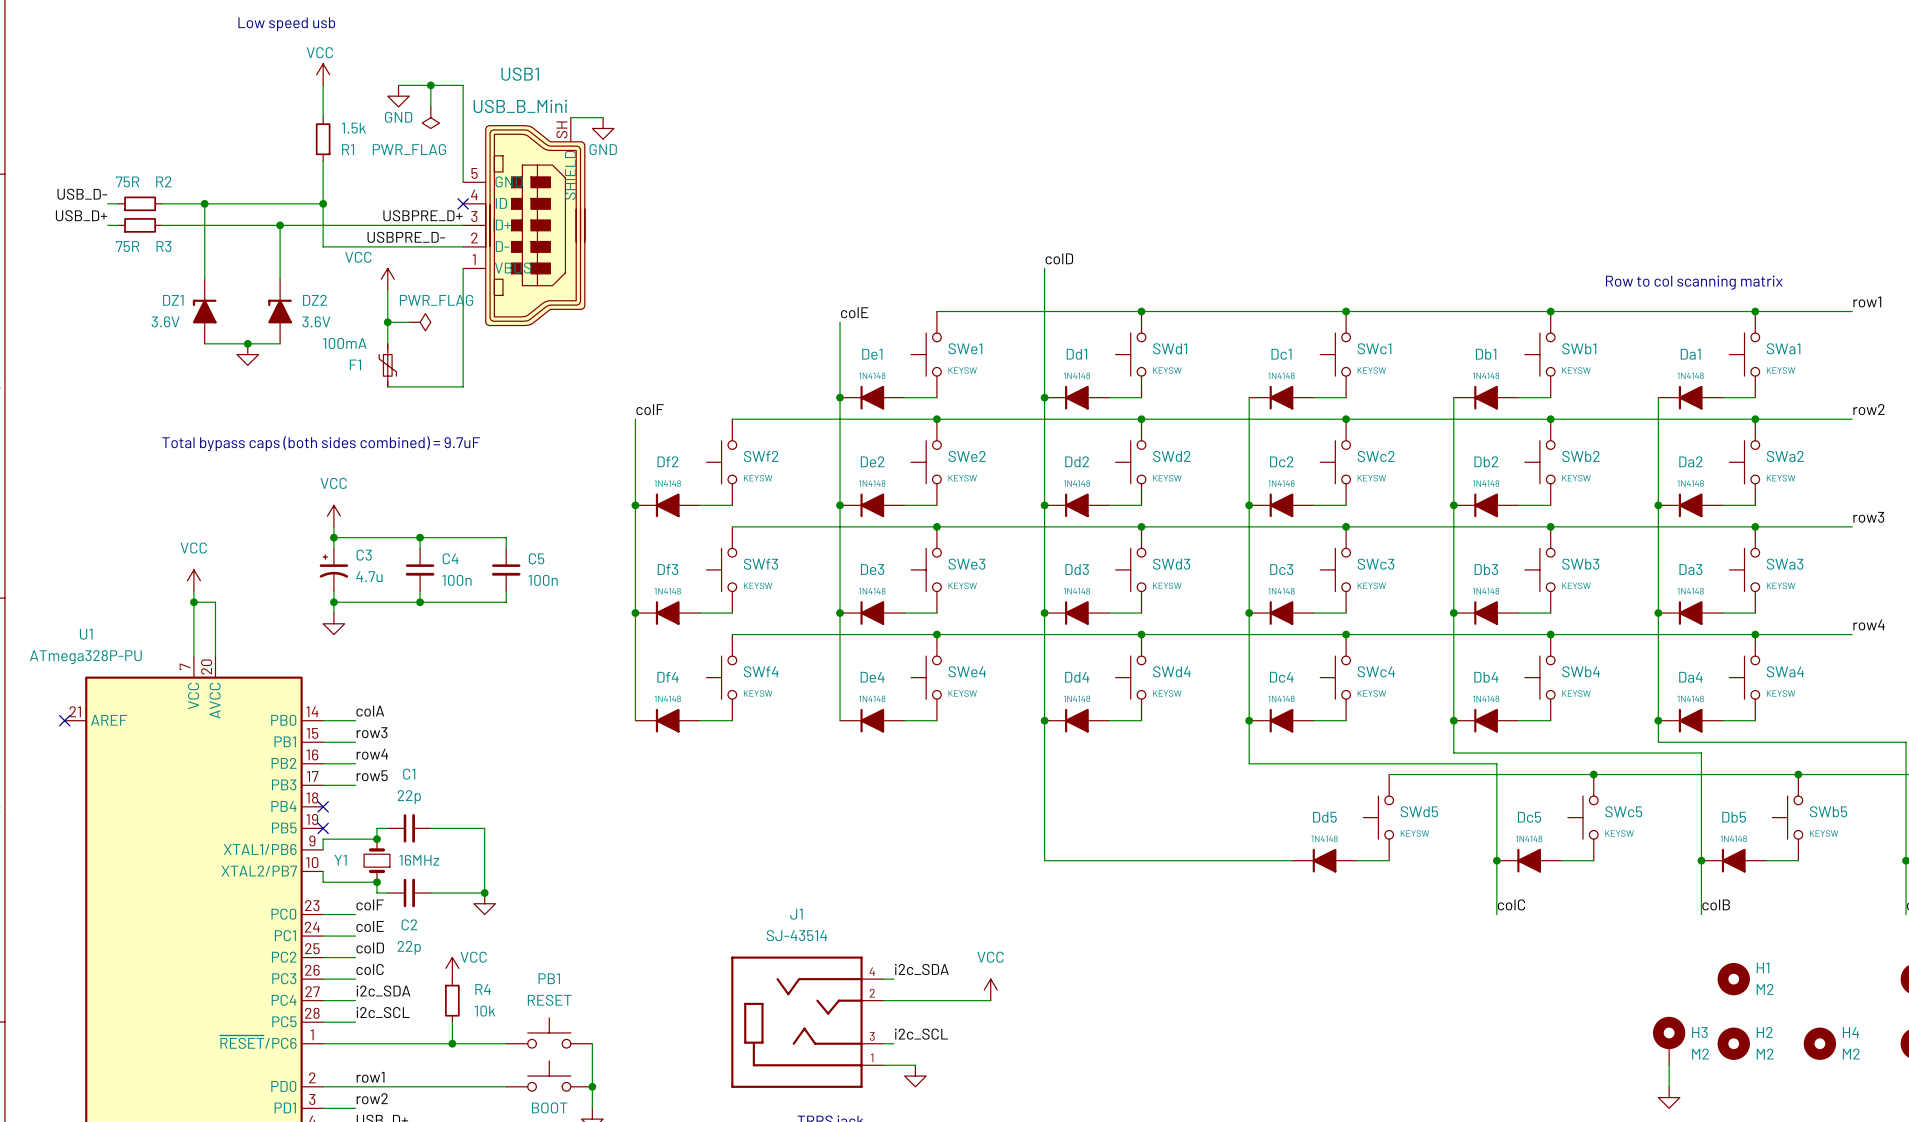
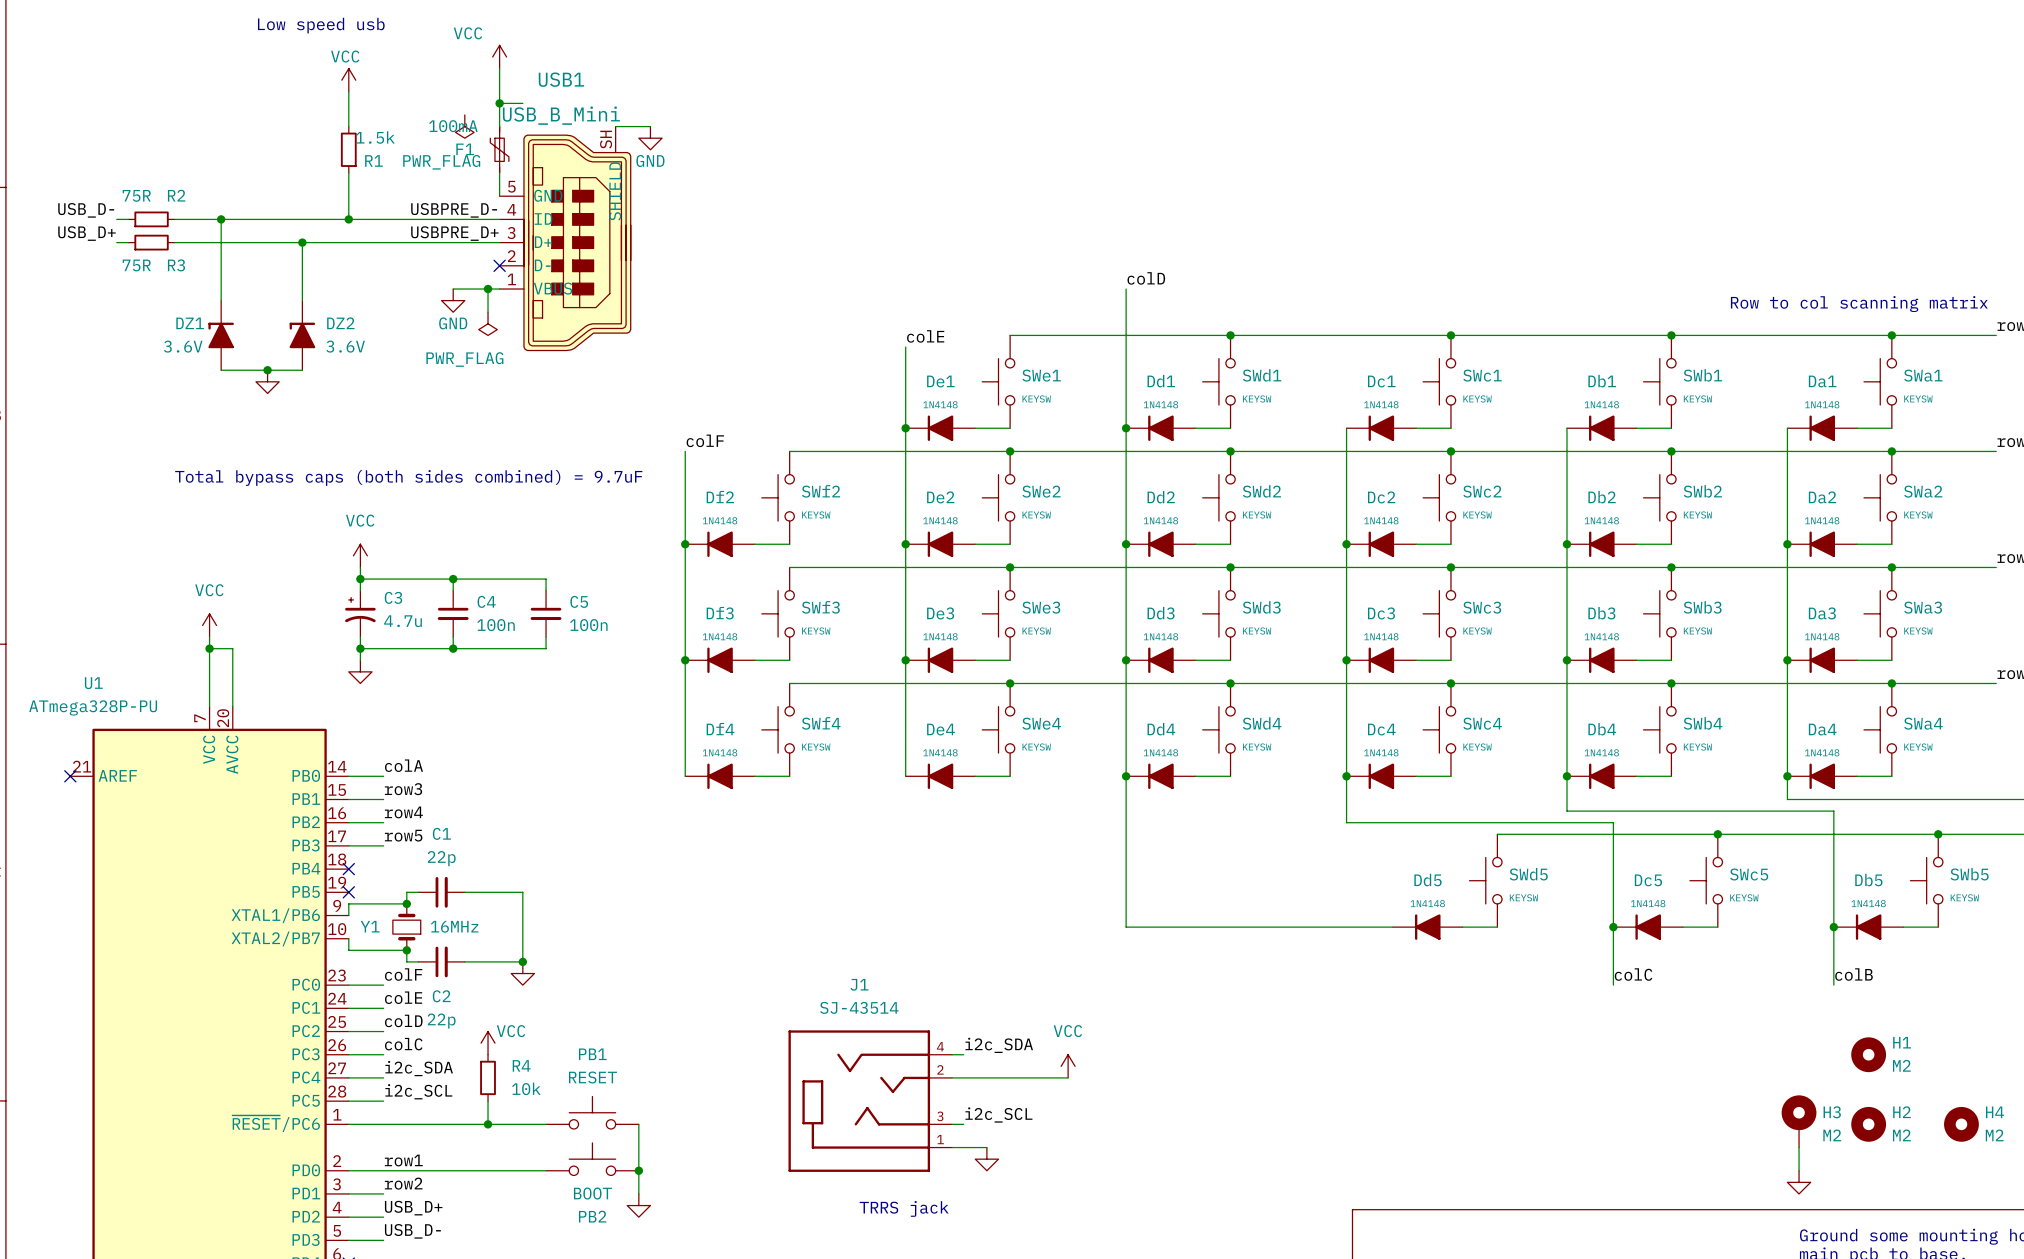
power symbol: none -> VCC (499, 56)
wire: (398, 85) (463, 85) -> (499, 68) (499, 91)
wire: (430, 85) (430, 106) -> (488, 289) (488, 312)
junction position: (430, 85) -> (499, 103)
power symbol position: GND (398, 96) -> GND (453, 300)
wire: none -> (499, 103) (522, 103)
wire: (323, 203) (323, 246) (463, 246) -> (348, 219) (499, 219)
no-connect mark position: (463, 203) -> (499, 265)
label position: USBPRE_D- (406, 237) -> USBPRE_D- (454, 210)
junction: none -> (488, 289)
wire: (463, 268) (463, 386) (387, 386) -> (499, 289) (453, 289)
power symbol: VCC (387, 279) -> none
wire: (387, 289) (387, 343) -> none
power symbol text position: PWR_FLAG (436, 300) -> PWR_FLAG (464, 359)
wire: (387, 322) (409, 322) -> none
junction: (387, 322) -> none
power symbol rotation: 0° (420, 322) -> 90° clockwise (488, 323)
power symbol position: PWR_FLAG (420, 322) -> PWR_FLAG (488, 323)
F1 position: (387, 365) -> (499, 149)

